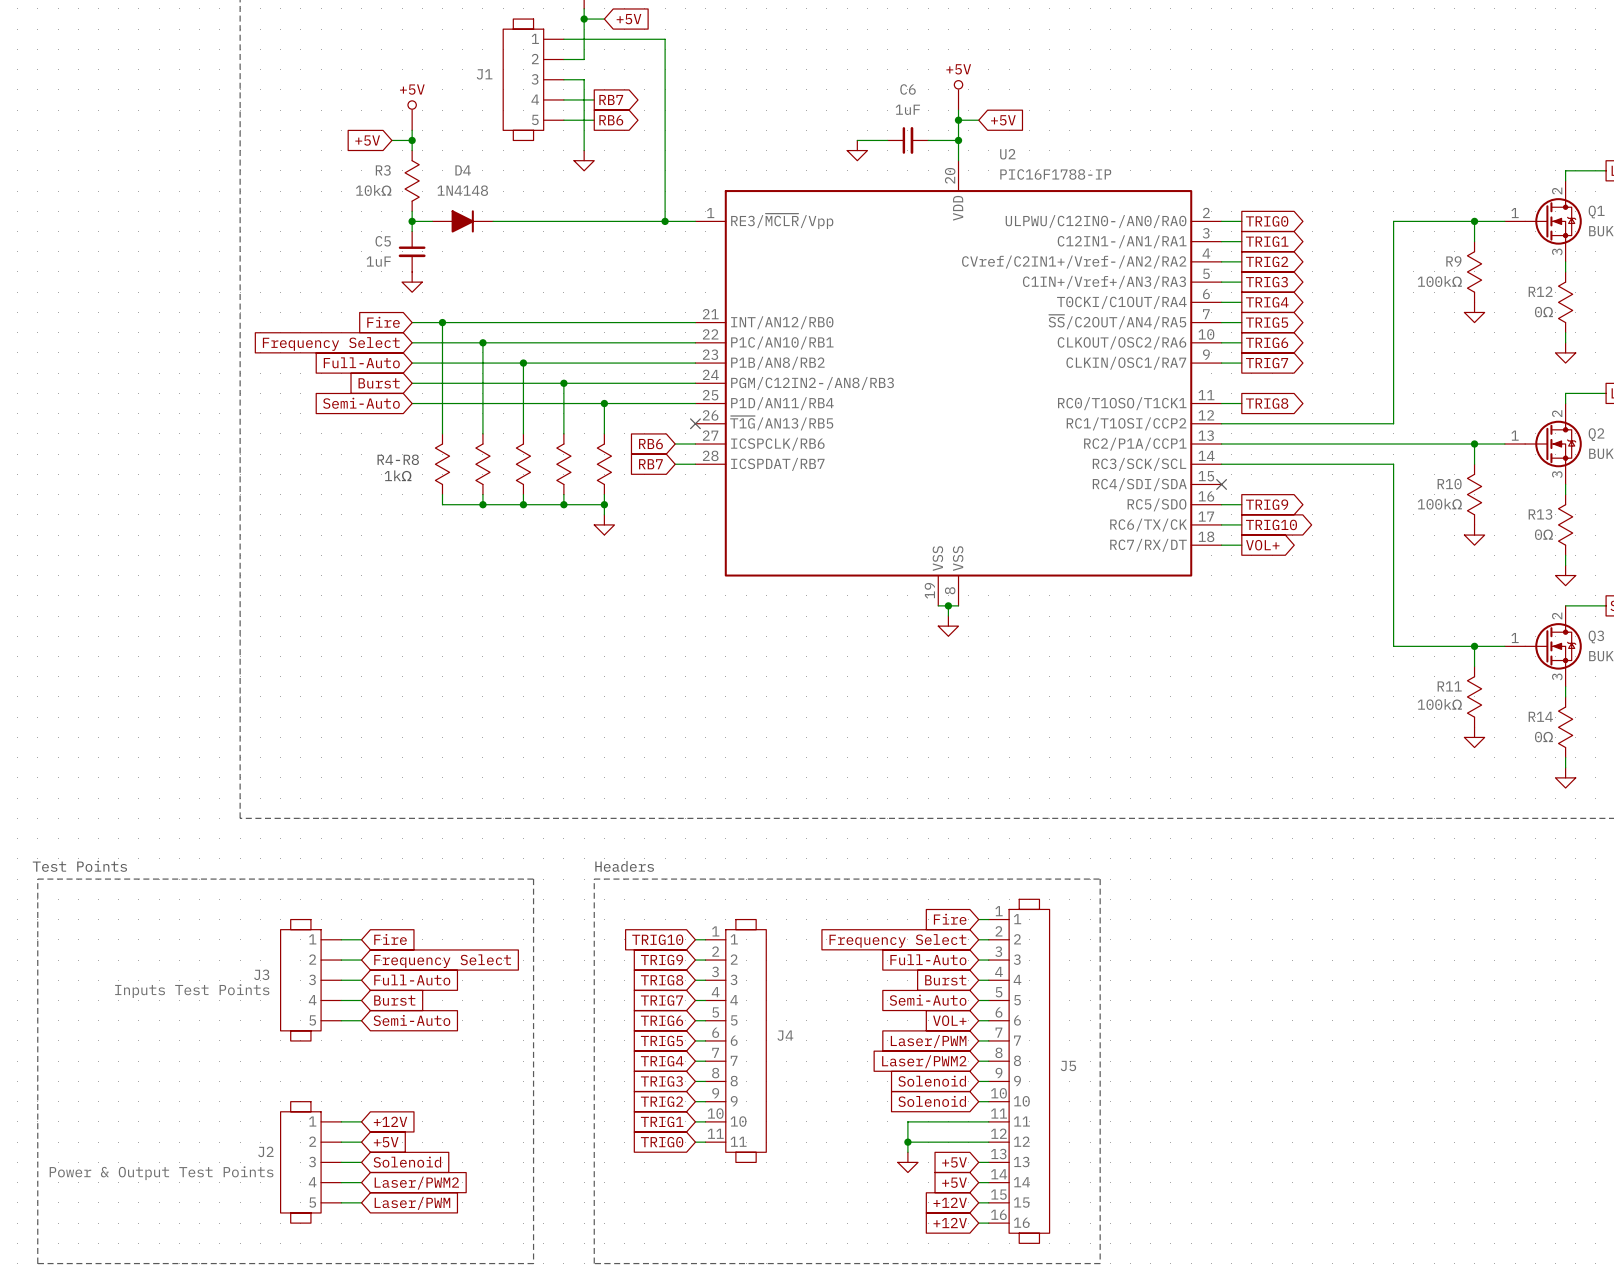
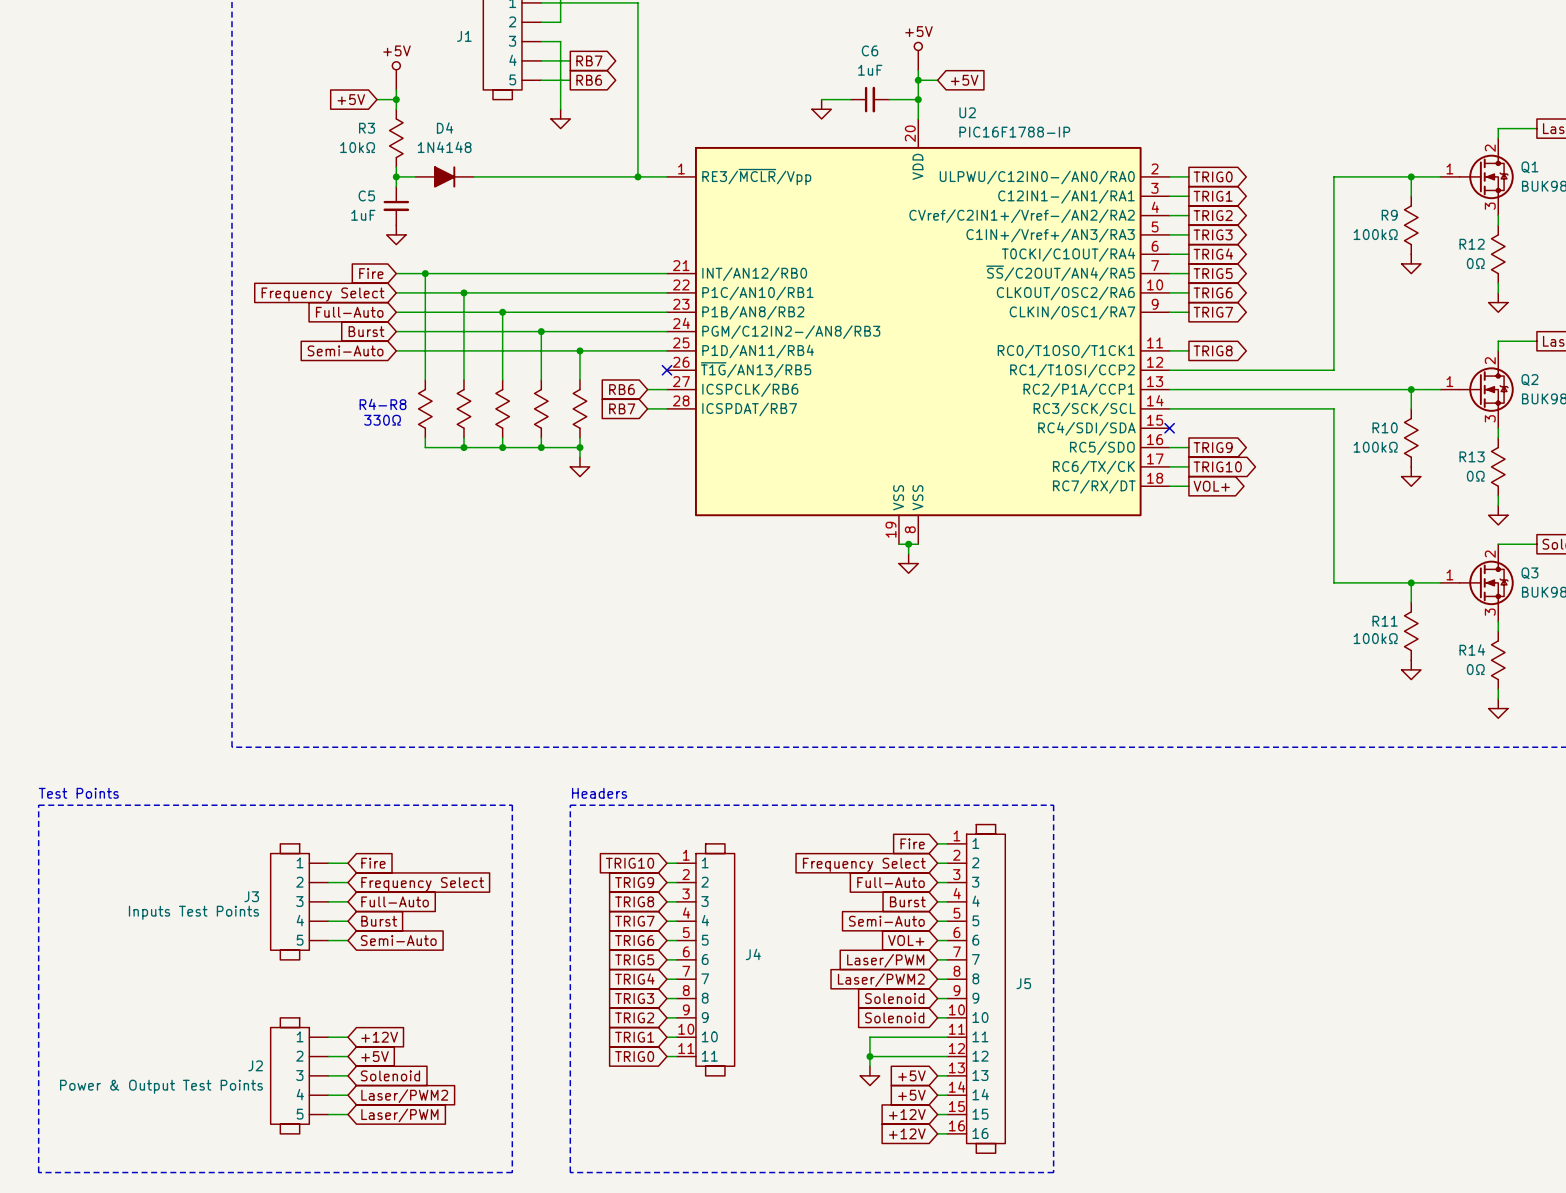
text: 1kΩ (398, 475) -> 330Ω (382, 420)

